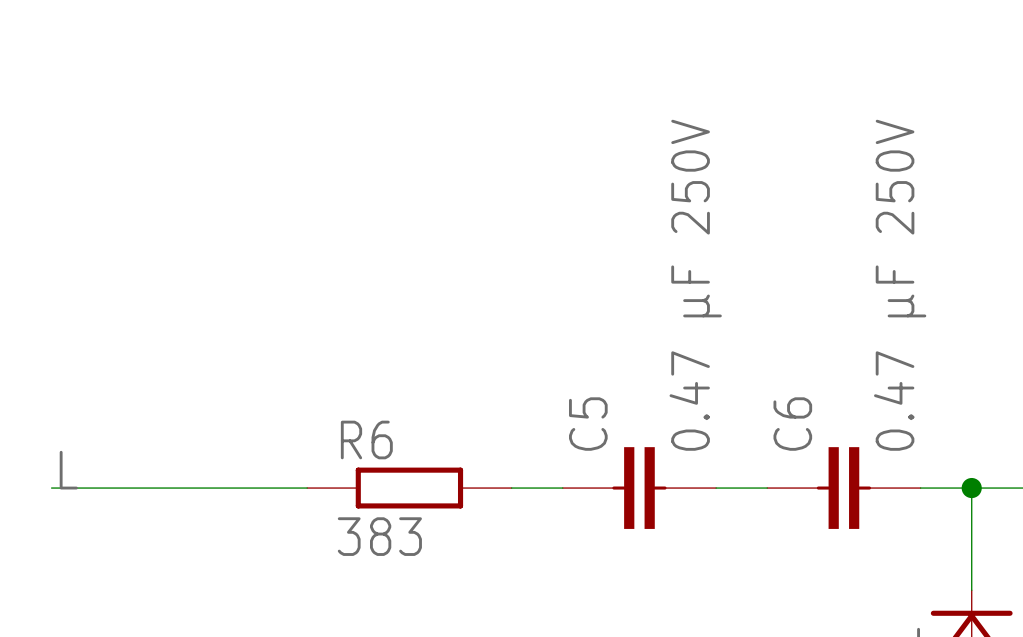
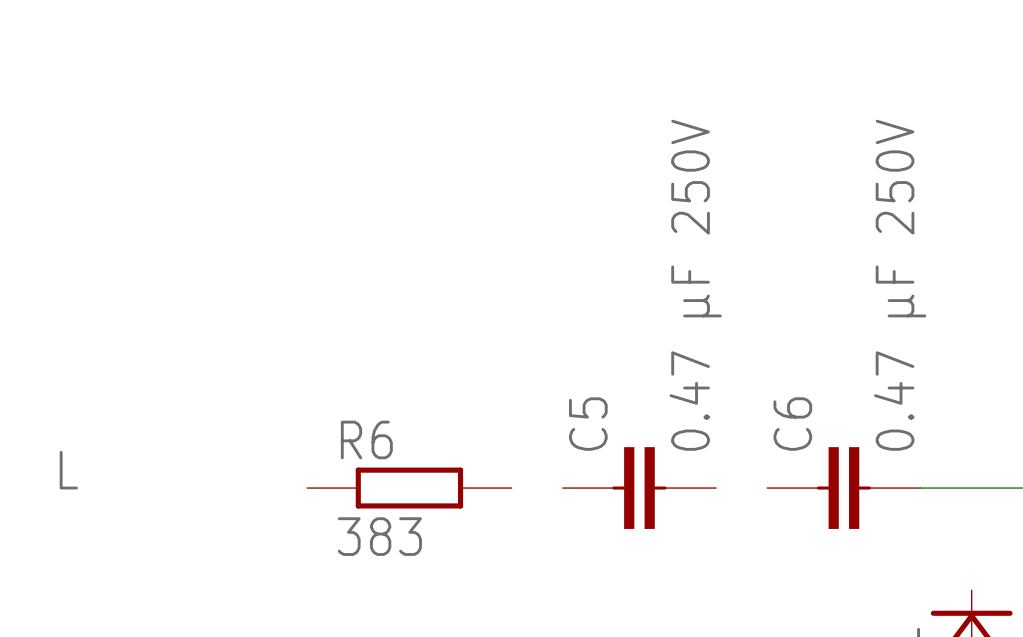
wire: (51, 488) (307, 488) -> none
wire: (511, 488) (562, 488) -> none
wire: (716, 488) (767, 488) -> none
wire: (971, 488) (971, 590) -> none
junction: (971, 488) -> none

